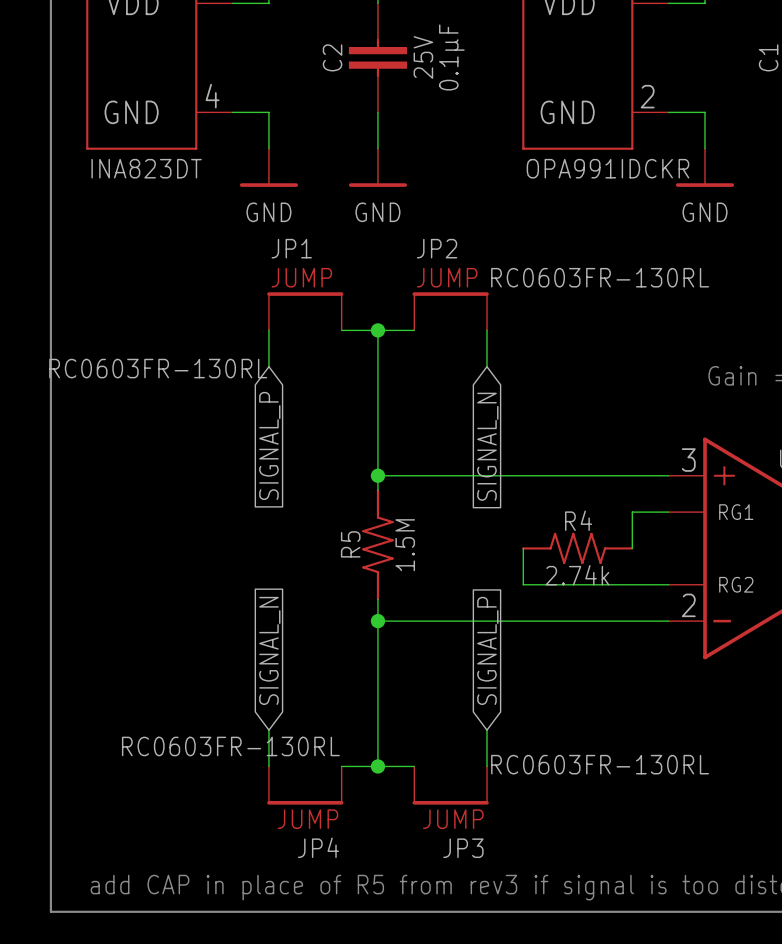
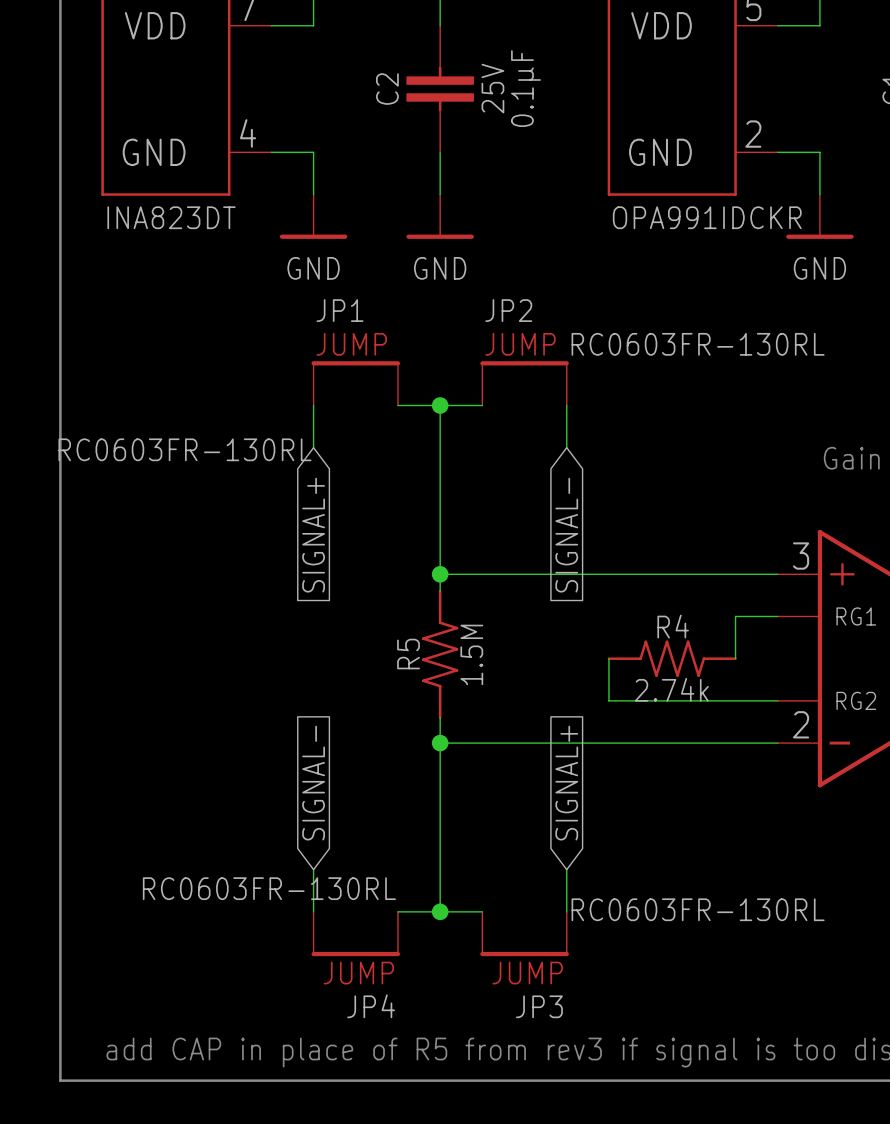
global label: SIGNAL_P (269, 445) -> SIGNAL+ (313, 535)
global label: SIGNAL_N (487, 446) -> SIGNAL- (566, 535)
global label: SIGNAL_N (269, 650) -> SIGNAL- (313, 783)
global label: SIGNAL_P (487, 650) -> SIGNAL+ (566, 783)

